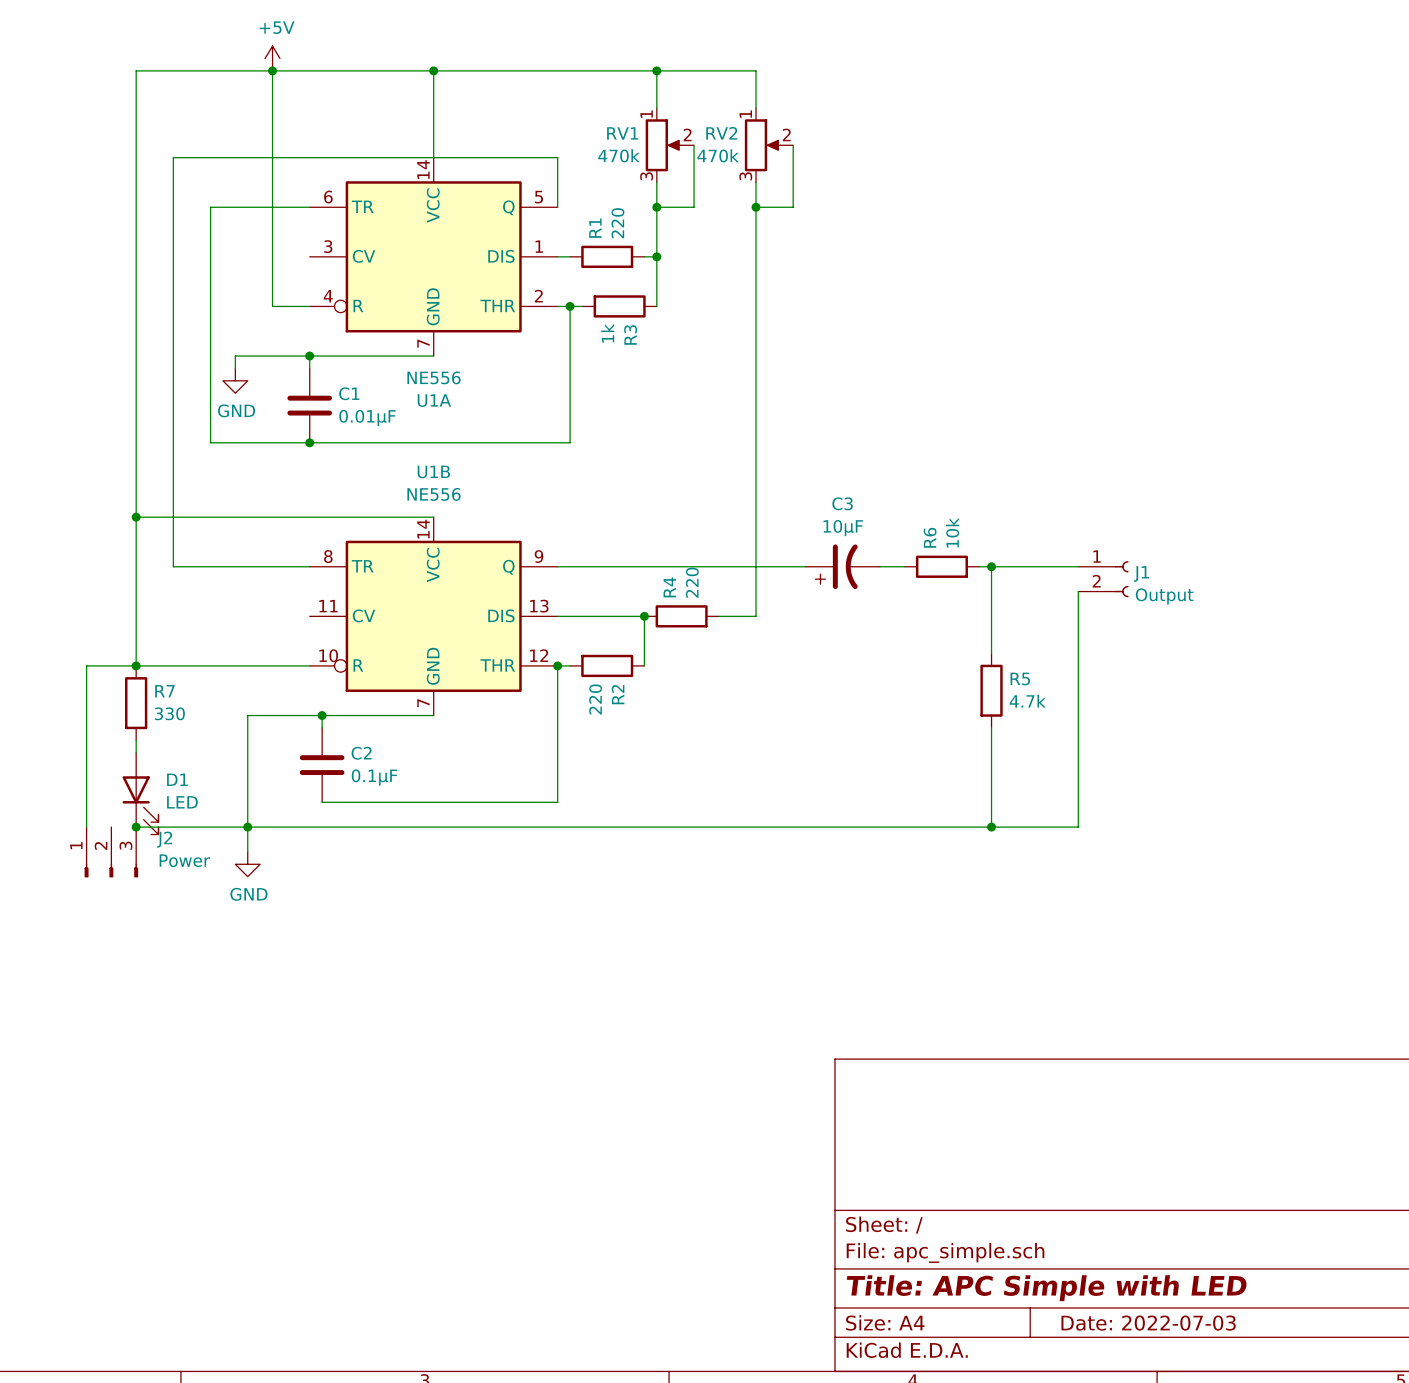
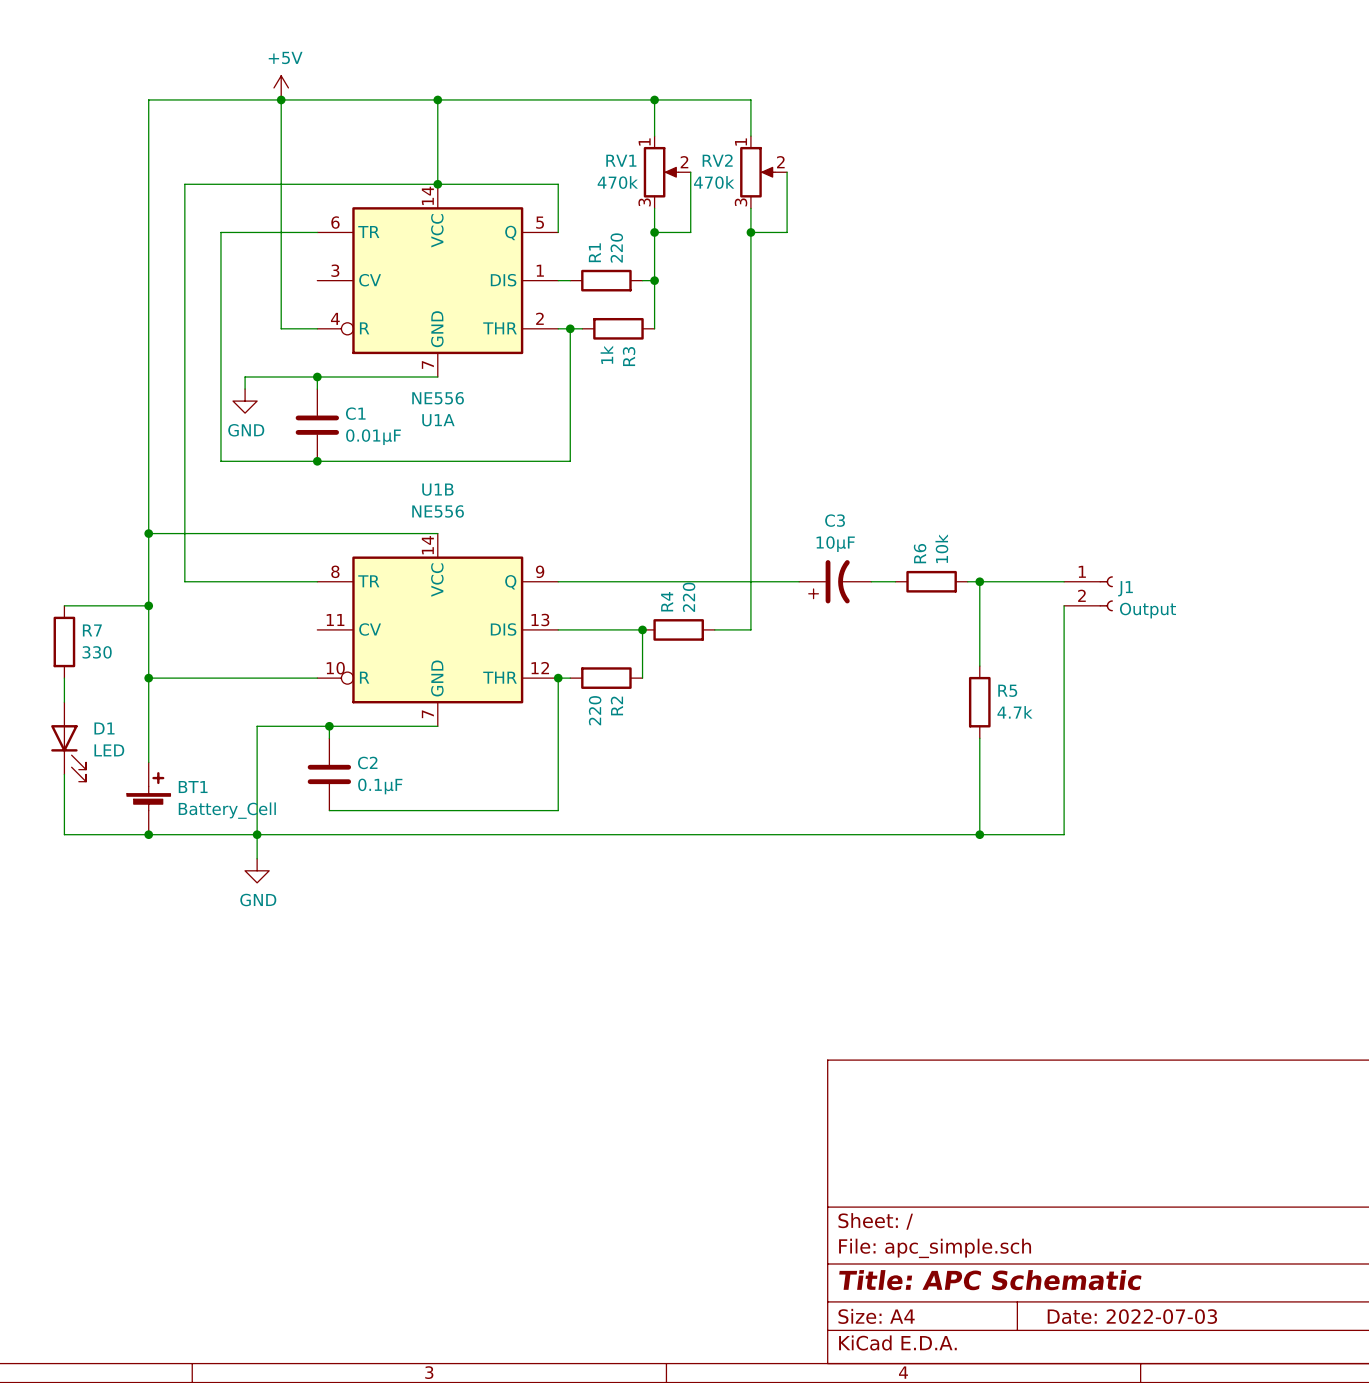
junction: none -> (437, 184)
wire: none -> (64, 605) (148, 605)
junction: none -> (148, 605)
wire: none -> (64, 678) (64, 702)
wire: (136, 665) (86, 665) (86, 827) -> (148, 678) (148, 750)
R7 position: (136, 703) -> (64, 641)
wire: none -> (64, 774) (64, 834) (148, 834)
BT1: none -> Battery_Cell (148, 798)
D1 position: (140, 793) -> (68, 741)
J2: Power (111, 852) -> none
title block: Title: APC Simple with LED (1046, 1288) -> Title: APC Schematic (990, 1280)

